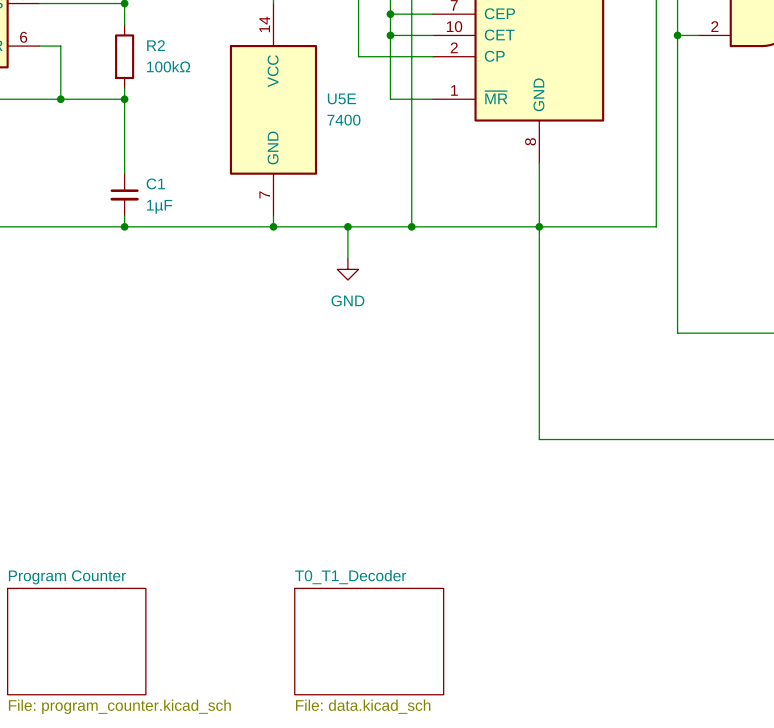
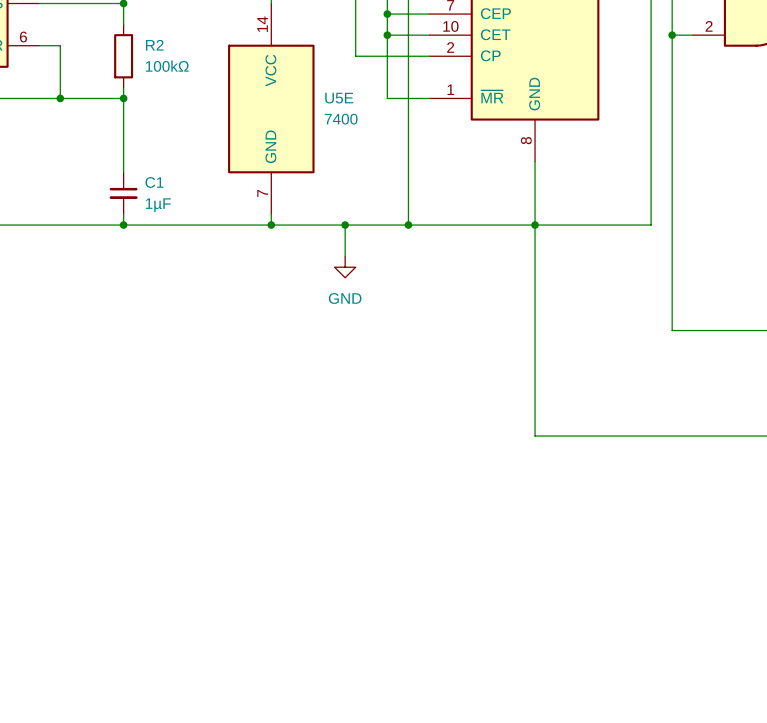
sheet Program Counter: File: program_counter.kicad_sch (76, 641) -> none
sheet T0_T1_Decoder: File: data.kicad_sch (369, 641) -> none

